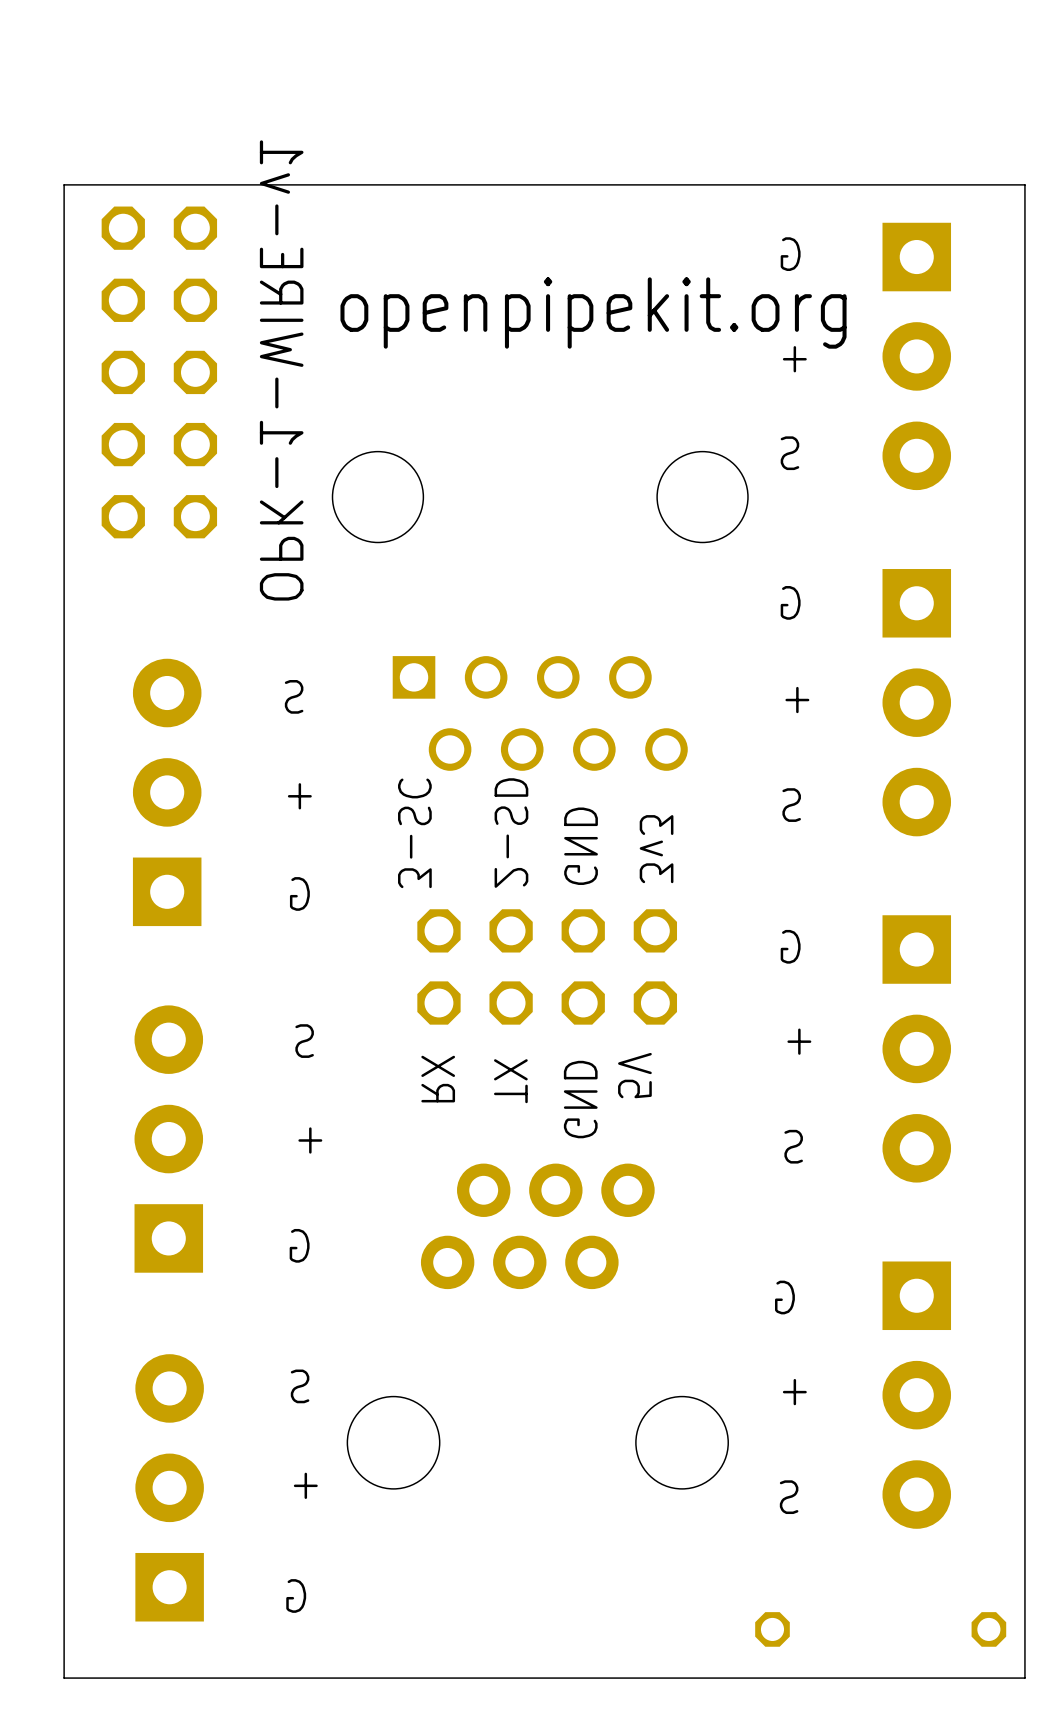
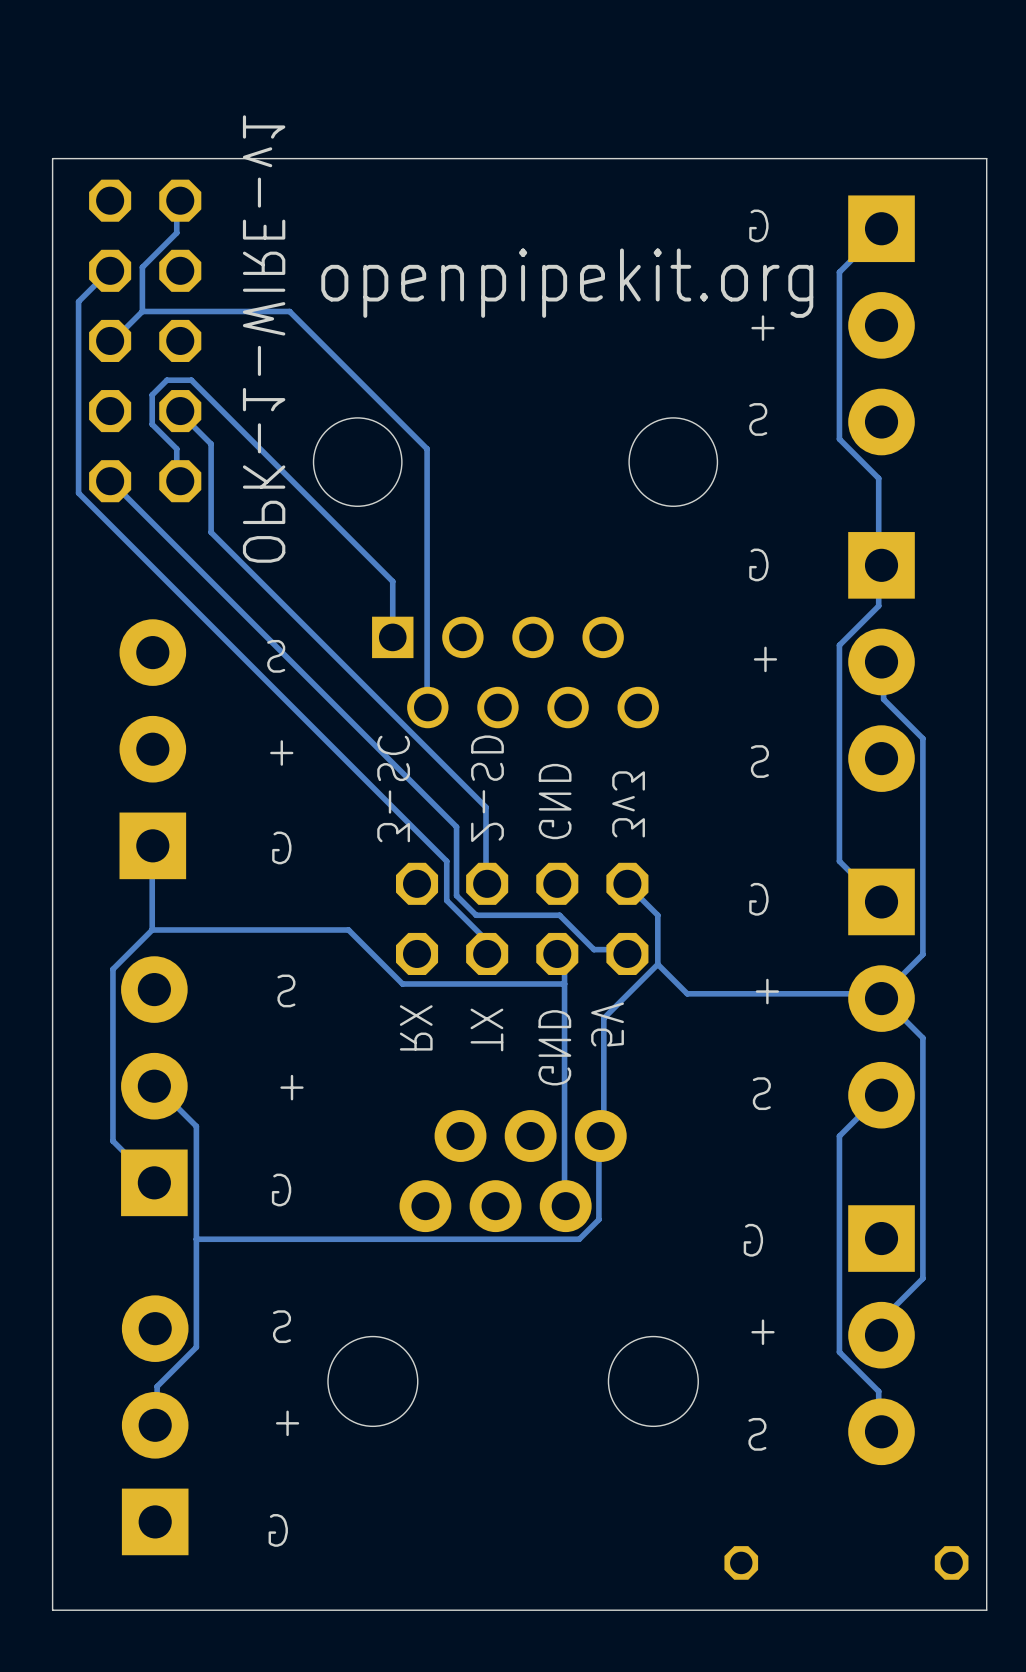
track: none -> (180, 200) (176, 203) (176, 232) (142, 267) (142, 311)
track: none -> (881, 228) (839, 272) (839, 439) (878, 478) (878, 561) (881, 565) (878, 566) (878, 606) (839, 645) (839, 861) (881, 901)
track: none -> (110, 270) (78, 301) (78, 493) (446, 861) (446, 900) (486, 939) (487, 953)
track: none -> (142, 311) (112, 340) (110, 340)
track: none -> (142, 311) (289, 311) (427, 448) (427, 707)
track: none -> (180, 411) (211, 444) (211, 532) (486, 807) (487, 883)
track: none -> (110, 481) (456, 826) (456, 895) (476, 915) (559, 915) (594, 949) (623, 949) (627, 953)
track: none -> (180, 481) (176, 478) (176, 448) (152, 424) (152, 394) (166, 380) (191, 380) (392, 581) (392, 637)
track: none -> (881, 661) (883, 664) (883, 699) (922, 738) (922, 954) (883, 993) (881, 998)
track: none -> (152, 845) (152, 929)
track: none -> (627, 883) (657, 915) (657, 964)
track: none -> (152, 929) (112, 969) (112, 1141) (154, 1182)
track: none -> (152, 929) (348, 929) (402, 983) (564, 983)
track: none -> (557, 953) (564, 959) (565, 1206)
track: none -> (657, 964) (603, 1018) (603, 1131) (598, 1136) (598, 1219) (579, 1239) (196, 1239)
track: none -> (657, 964) (687, 993) (878, 993) (881, 998)
track: none -> (881, 998) (922, 1037) (922, 1278) (883, 1317) (883, 1332) (881, 1335)
track: none -> (154, 1086) (196, 1126) (196, 1347) (157, 1386) (157, 1420) (155, 1425)
track: none -> (881, 1095) (839, 1136) (839, 1352) (878, 1391) (878, 1430) (881, 1431)

